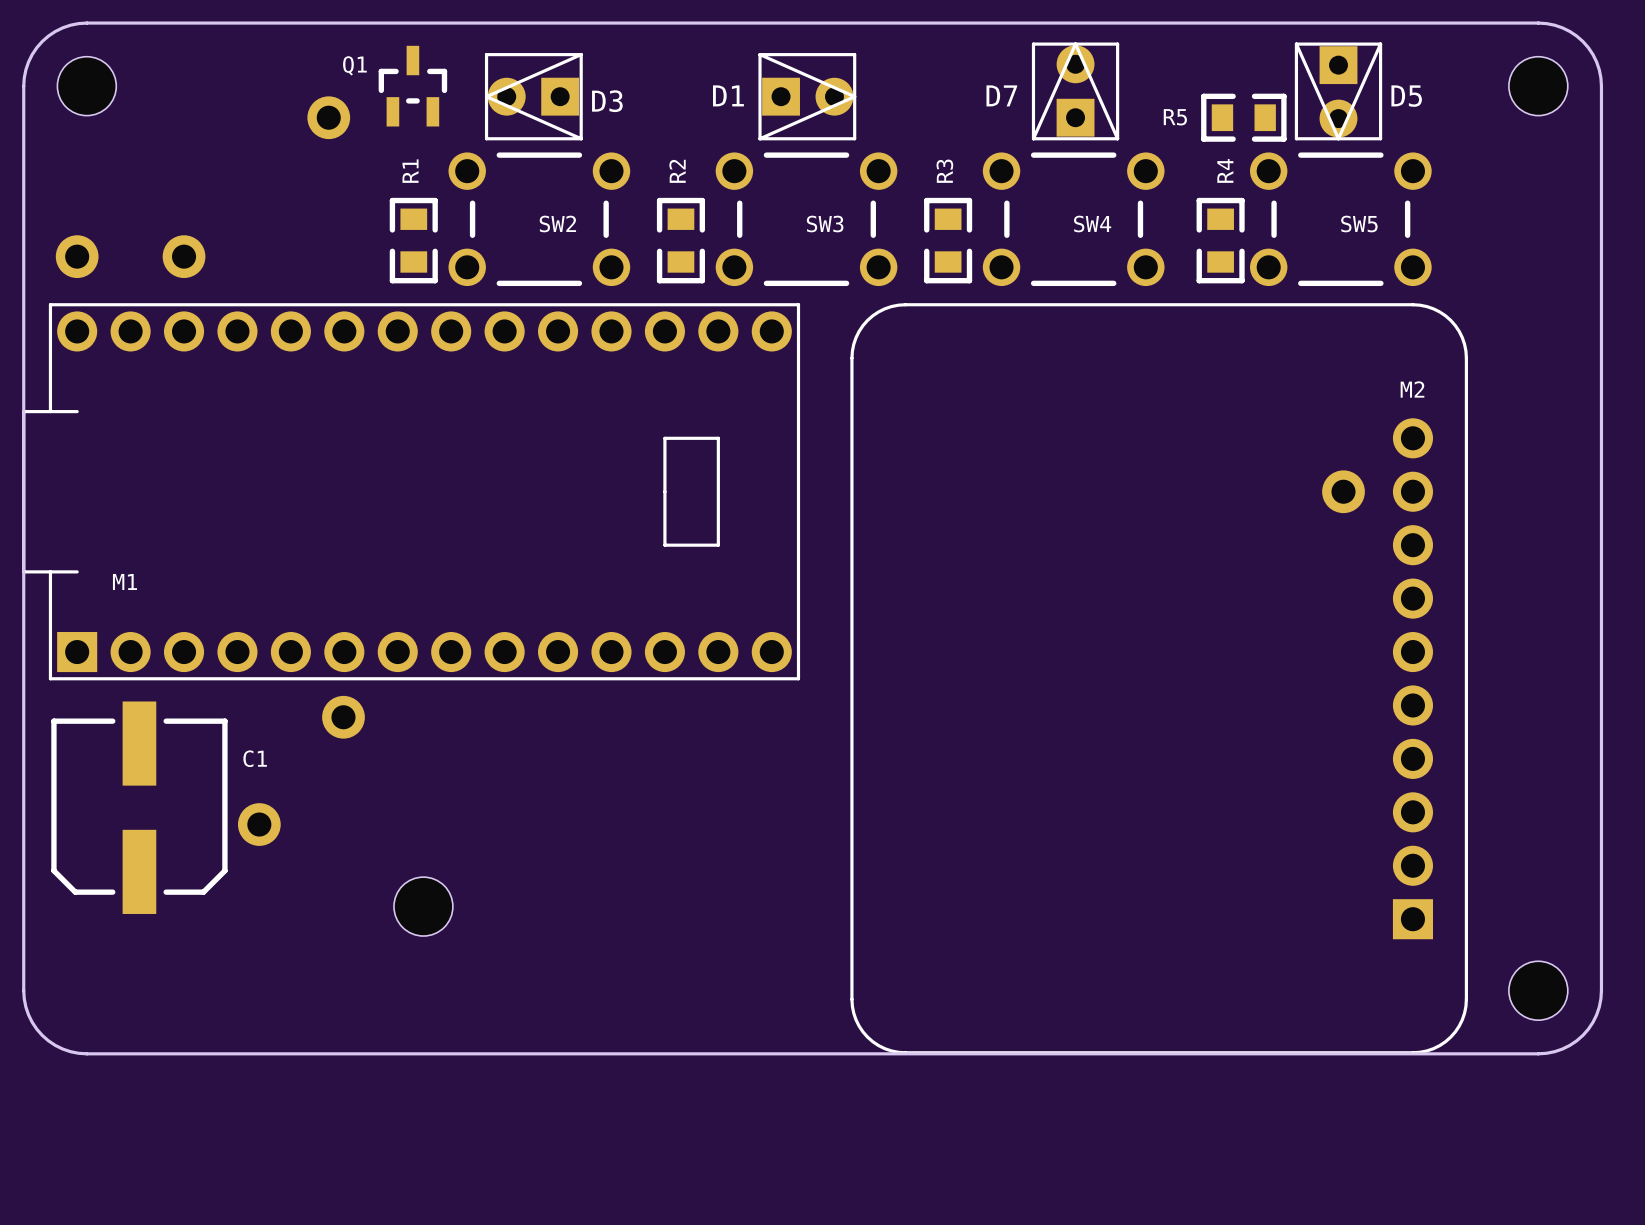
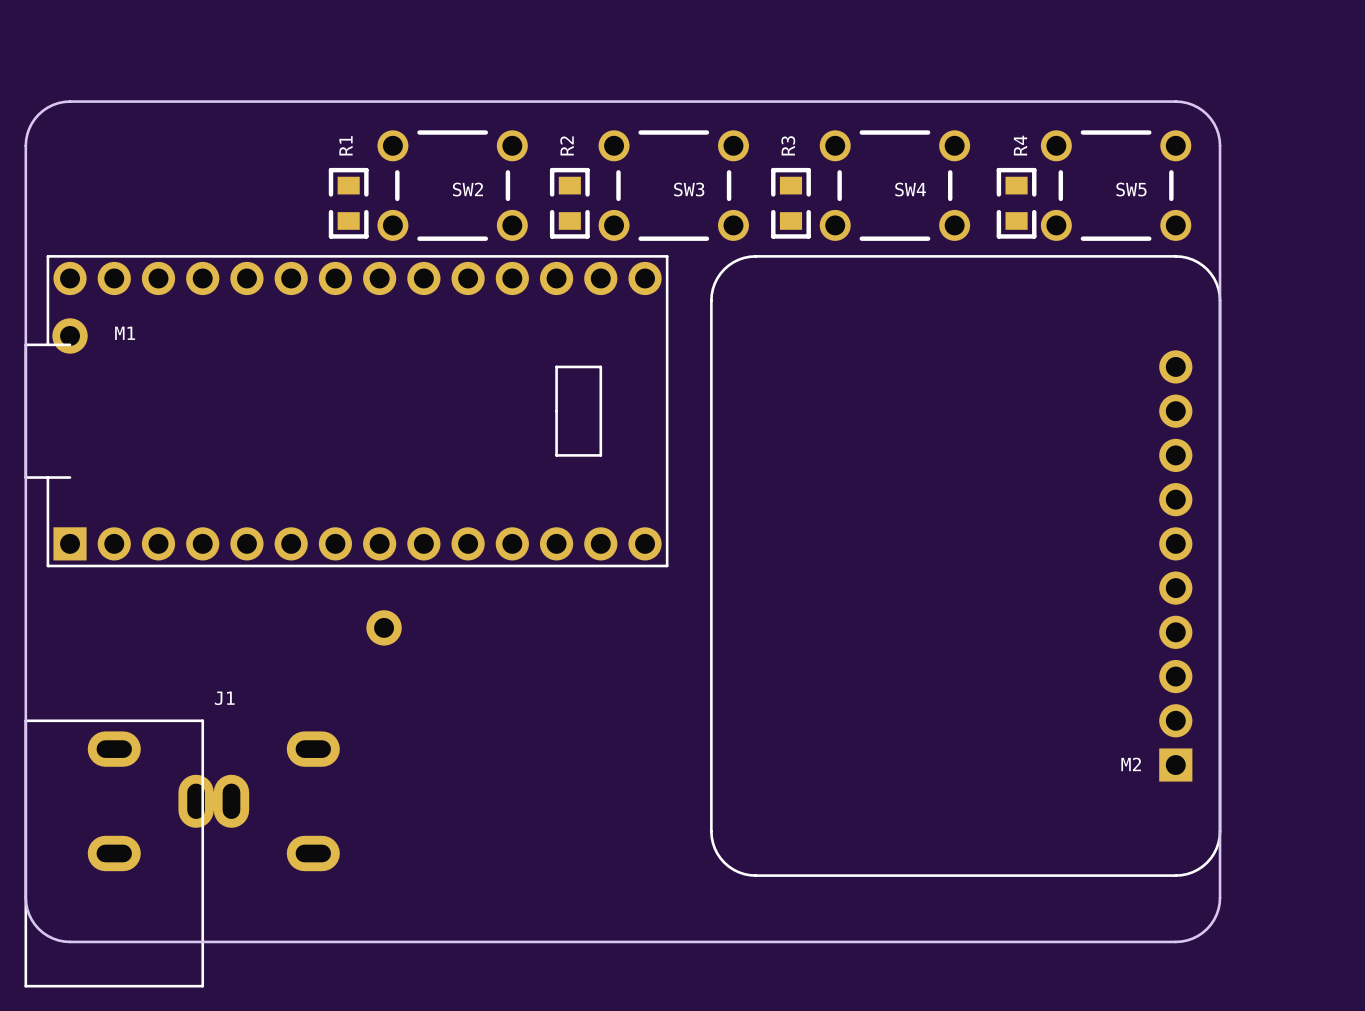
part: (86, 86) -> none
Q1: (412, 86) -> none
part: (1538, 86) -> none
D7: (1075, 91) -> none
D5: (1338, 91) -> none
D3: (533, 96) -> none
D1: (807, 96) -> none
part: (328, 117) -> none
R5: (1243, 117) -> none
board edge: (23, 171) (23, 86) (28, 62) (36, 47) (48, 36) (70, 25) (86, 23) (1538, 23) (1562, 27) (1582, 41) (1596, 62) (1601, 86) (1601, 990) (1599, 1007) (1593, 1022) (1582, 1035) (1569, 1045) (1554, 1051) (1538, 1053) (86, 1053) (62, 1049) (42, 1035) (28, 1014) (23, 990) -> (25, 145) (29, 128) (38, 114) (53, 104) (70, 101) (1175, 101) (1187, 103) (1197, 107) (1207, 114) (1214, 123) (1218, 134) (1220, 145) (1220, 897) (1216, 914) (1207, 928) (1192, 938) (1175, 941) (70, 941) (58, 940) (47, 936) (38, 928) (29, 914) (25, 897) (25, 824)
part: (77, 256) -> none
part: (184, 256) -> none
M2 name position: M2 (1412, 389) -> M2 (1131, 764)
part: none -> (70, 335)
part: (1343, 491) -> none
M1 name position: M1 (124, 581) -> M1 (125, 333)
part: (343, 717) -> none
part: none -> (384, 627)
C1: (139, 807) -> none
part: (259, 824) -> none
part: (423, 906) -> none
part: none -> (276, 801)
part: (1538, 990) -> none
J1: none -> (119, 853)

